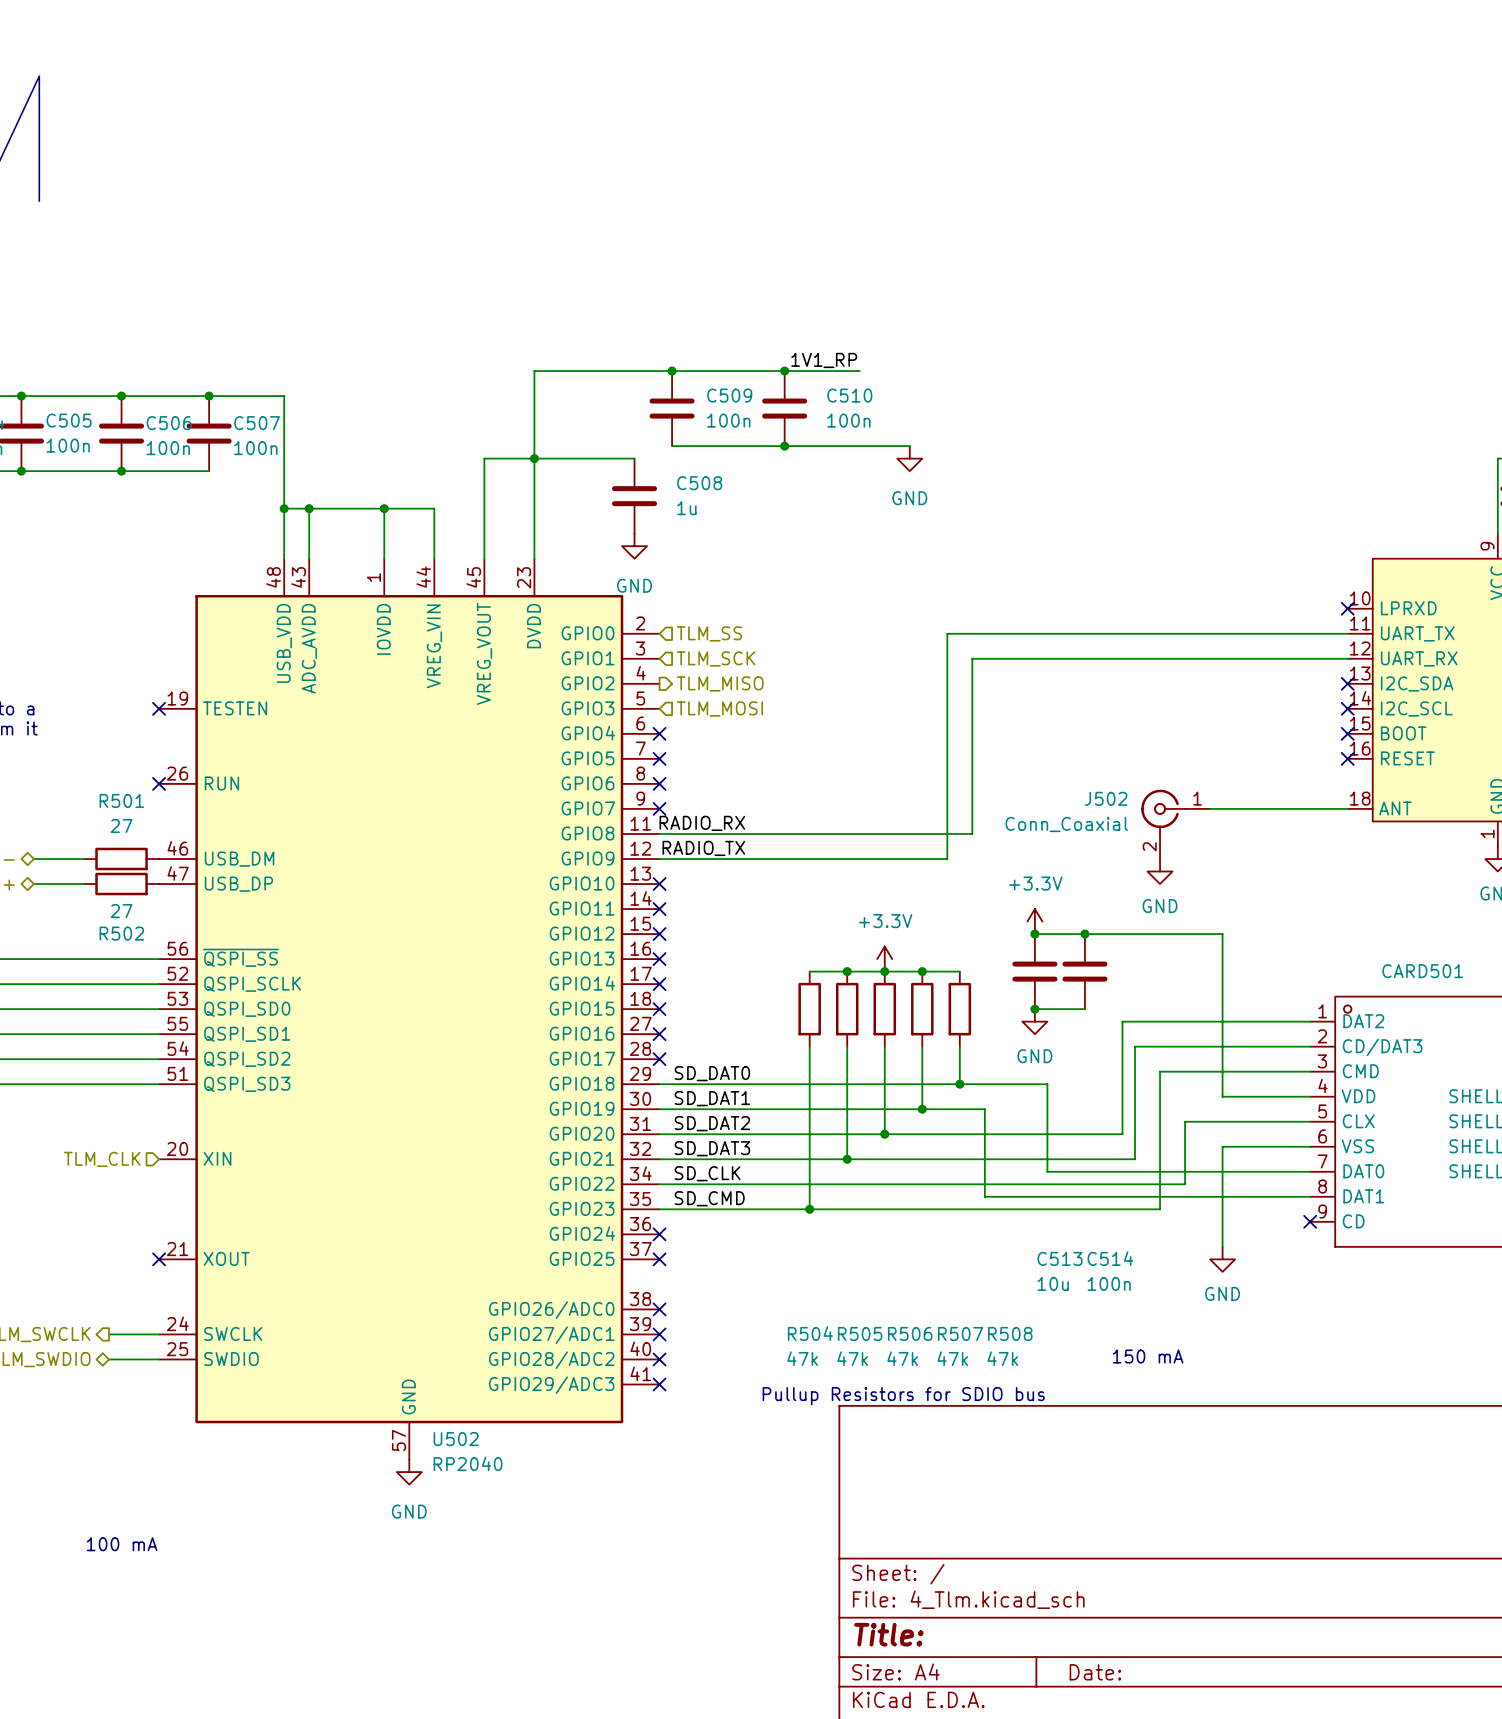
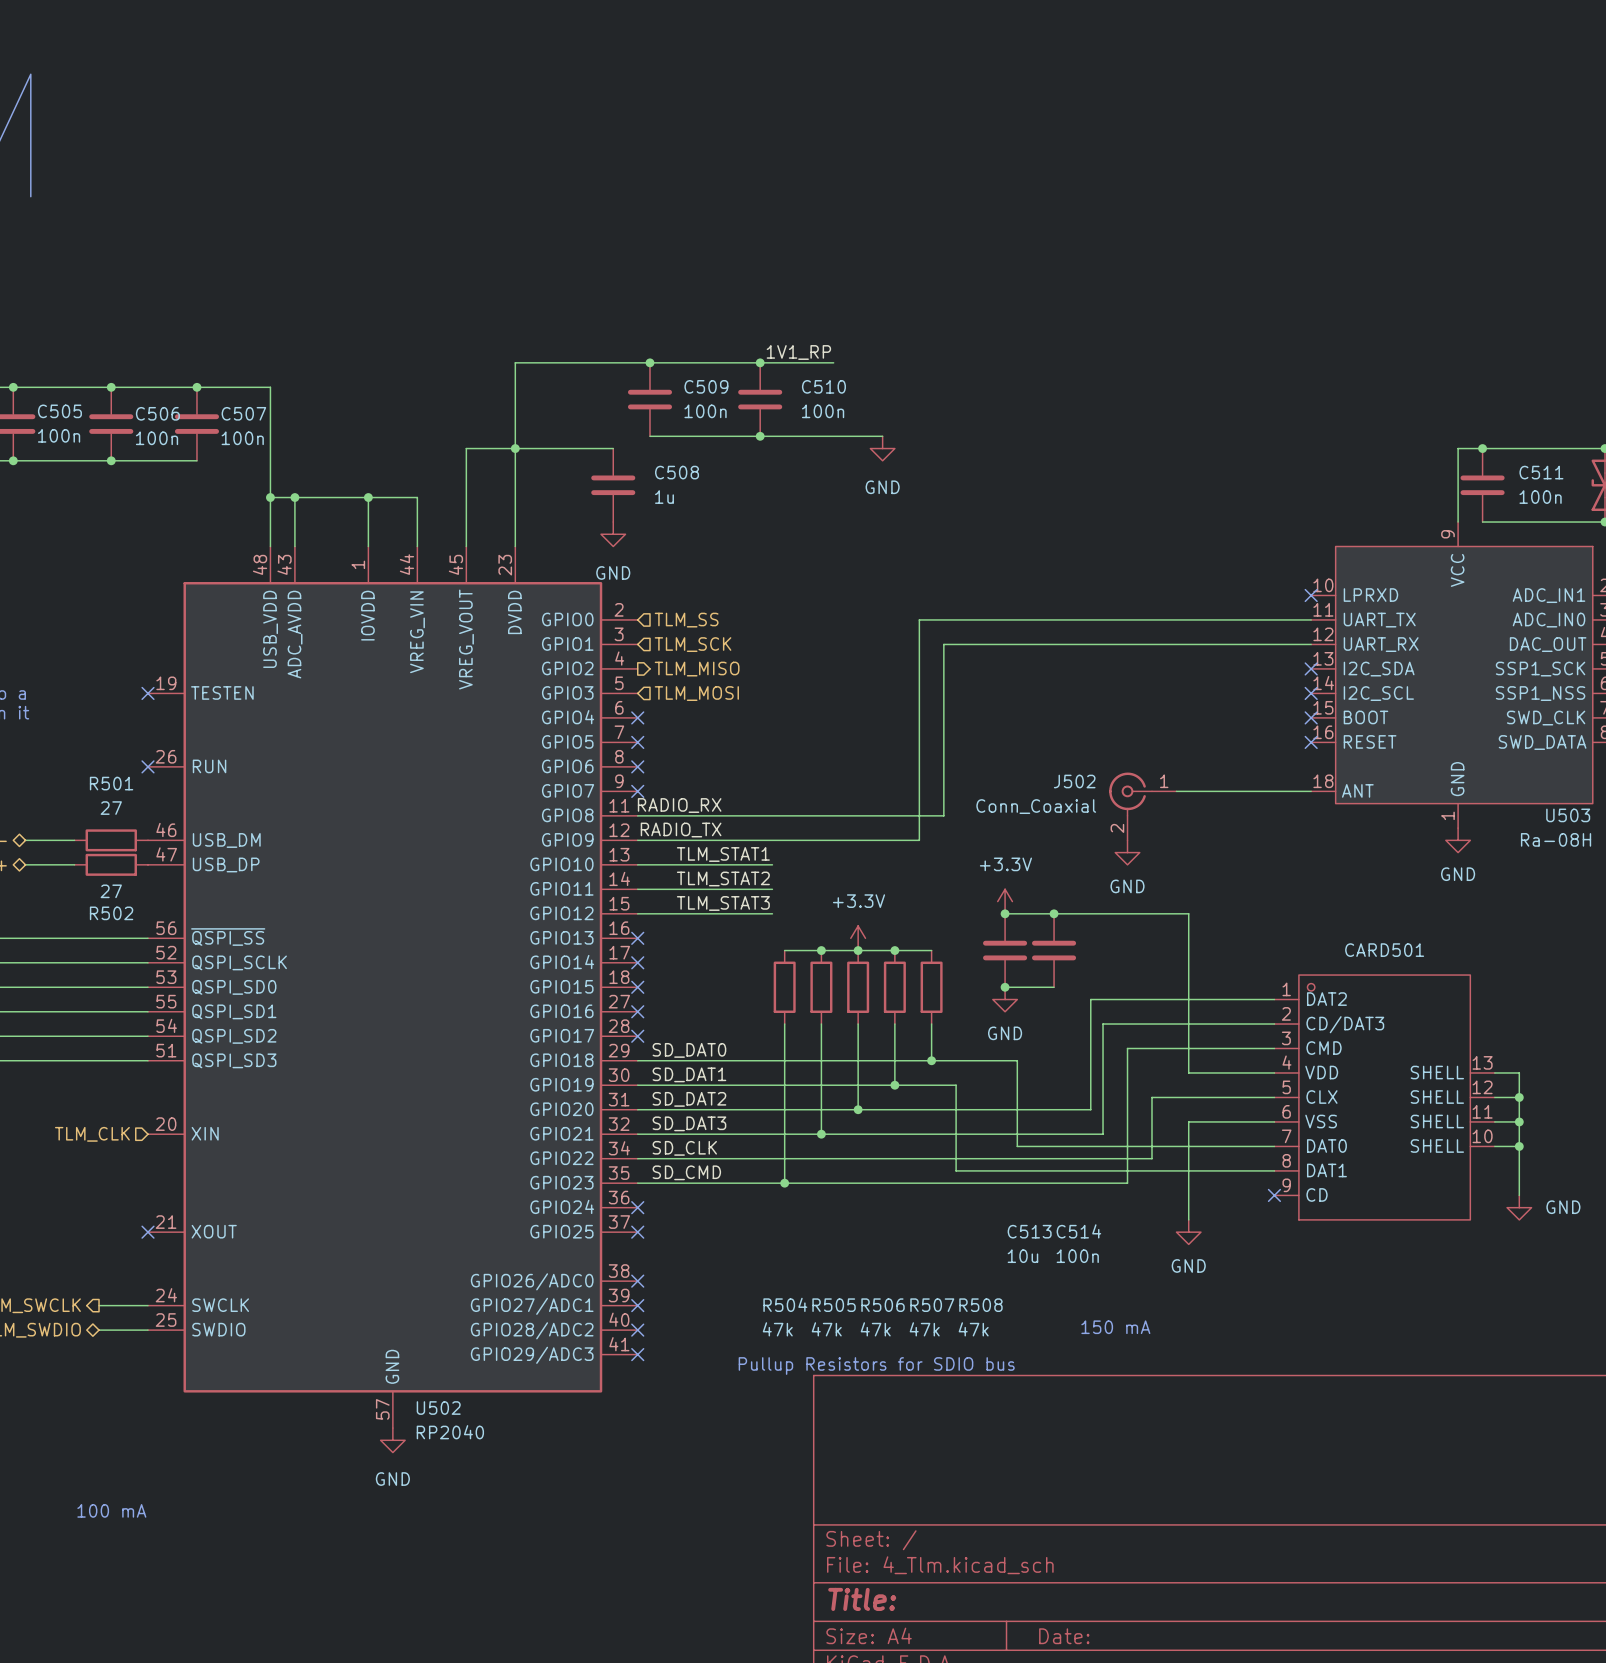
label: none -> TLM_STAT1 (723, 854)
wire: none -> (637, 864) (772, 864)
no-connect mark: (659, 884) -> none
label: none -> TLM_STAT2 (723, 878)
wire: none -> (637, 889) (772, 889)
no-connect mark: (659, 909) -> none
label: none -> TLM_STAT3 (723, 903)
wire: none -> (637, 913) (772, 913)
no-connect mark: (659, 934) -> none

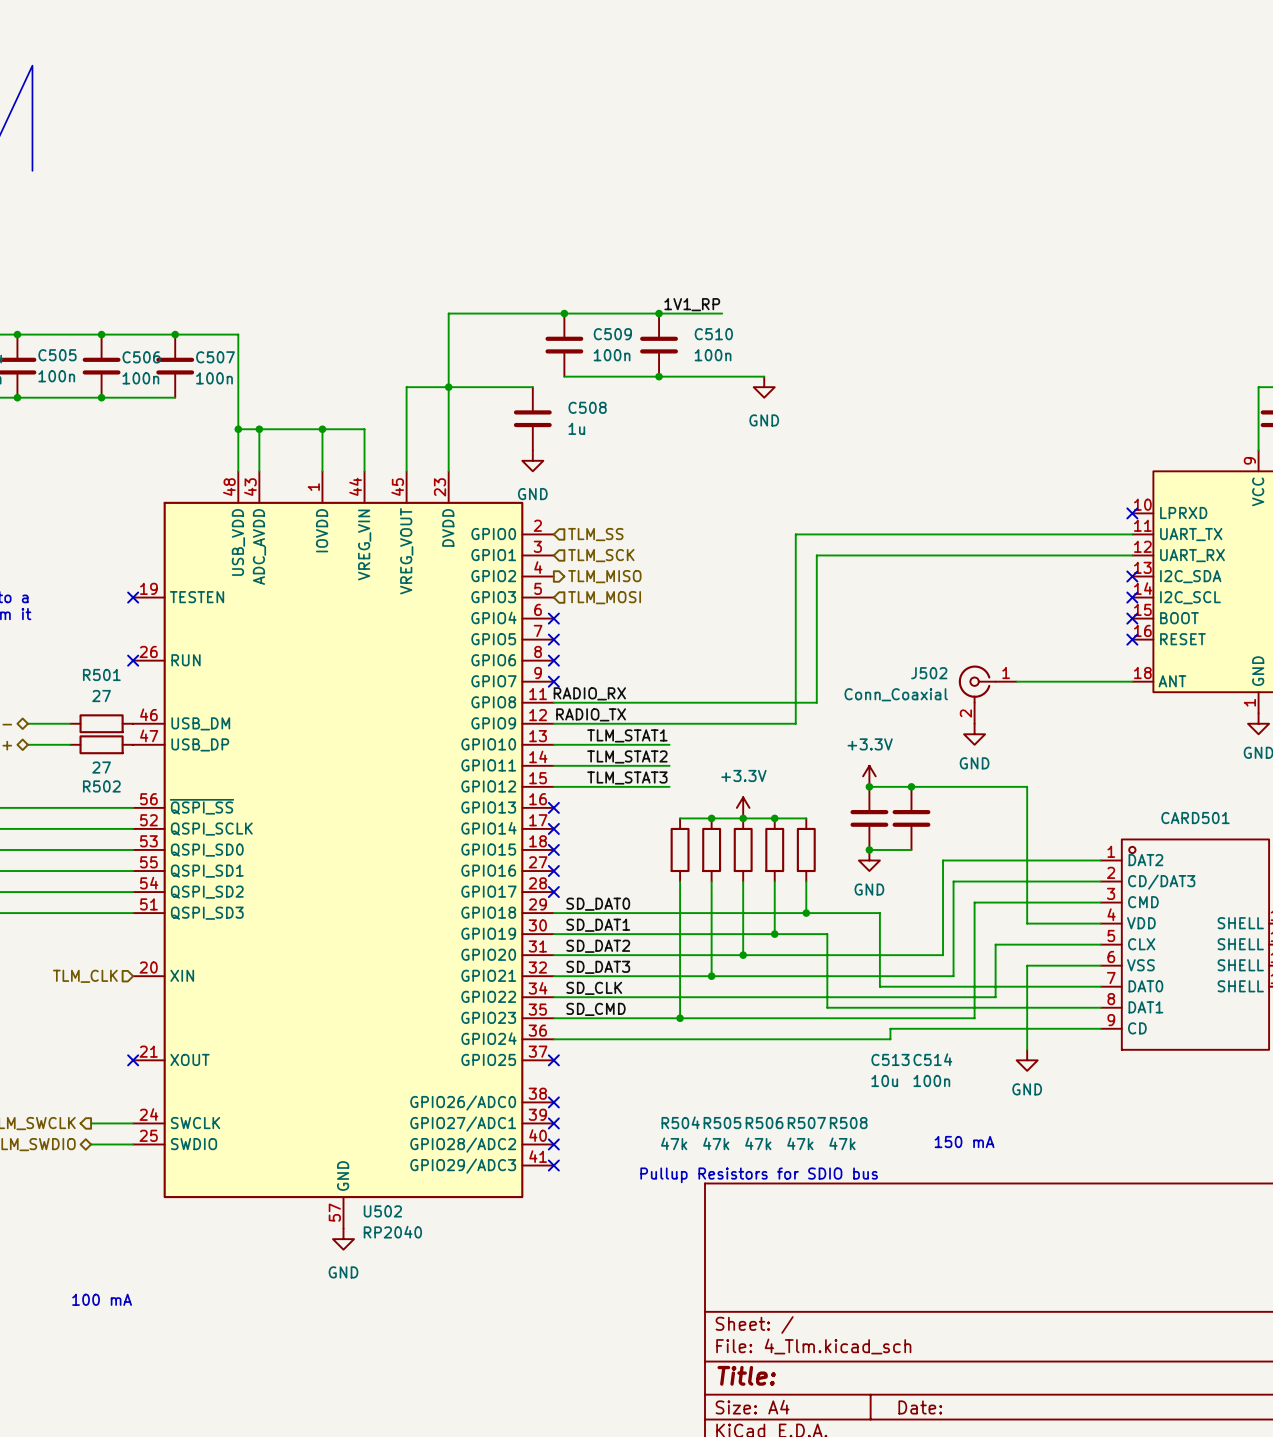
wire: none -> (1100, 1028) (890, 1028) (890, 1039) (553, 1039)
no-connect mark: (1274, 1195) -> none
no-connect mark: (637, 1207) -> none

